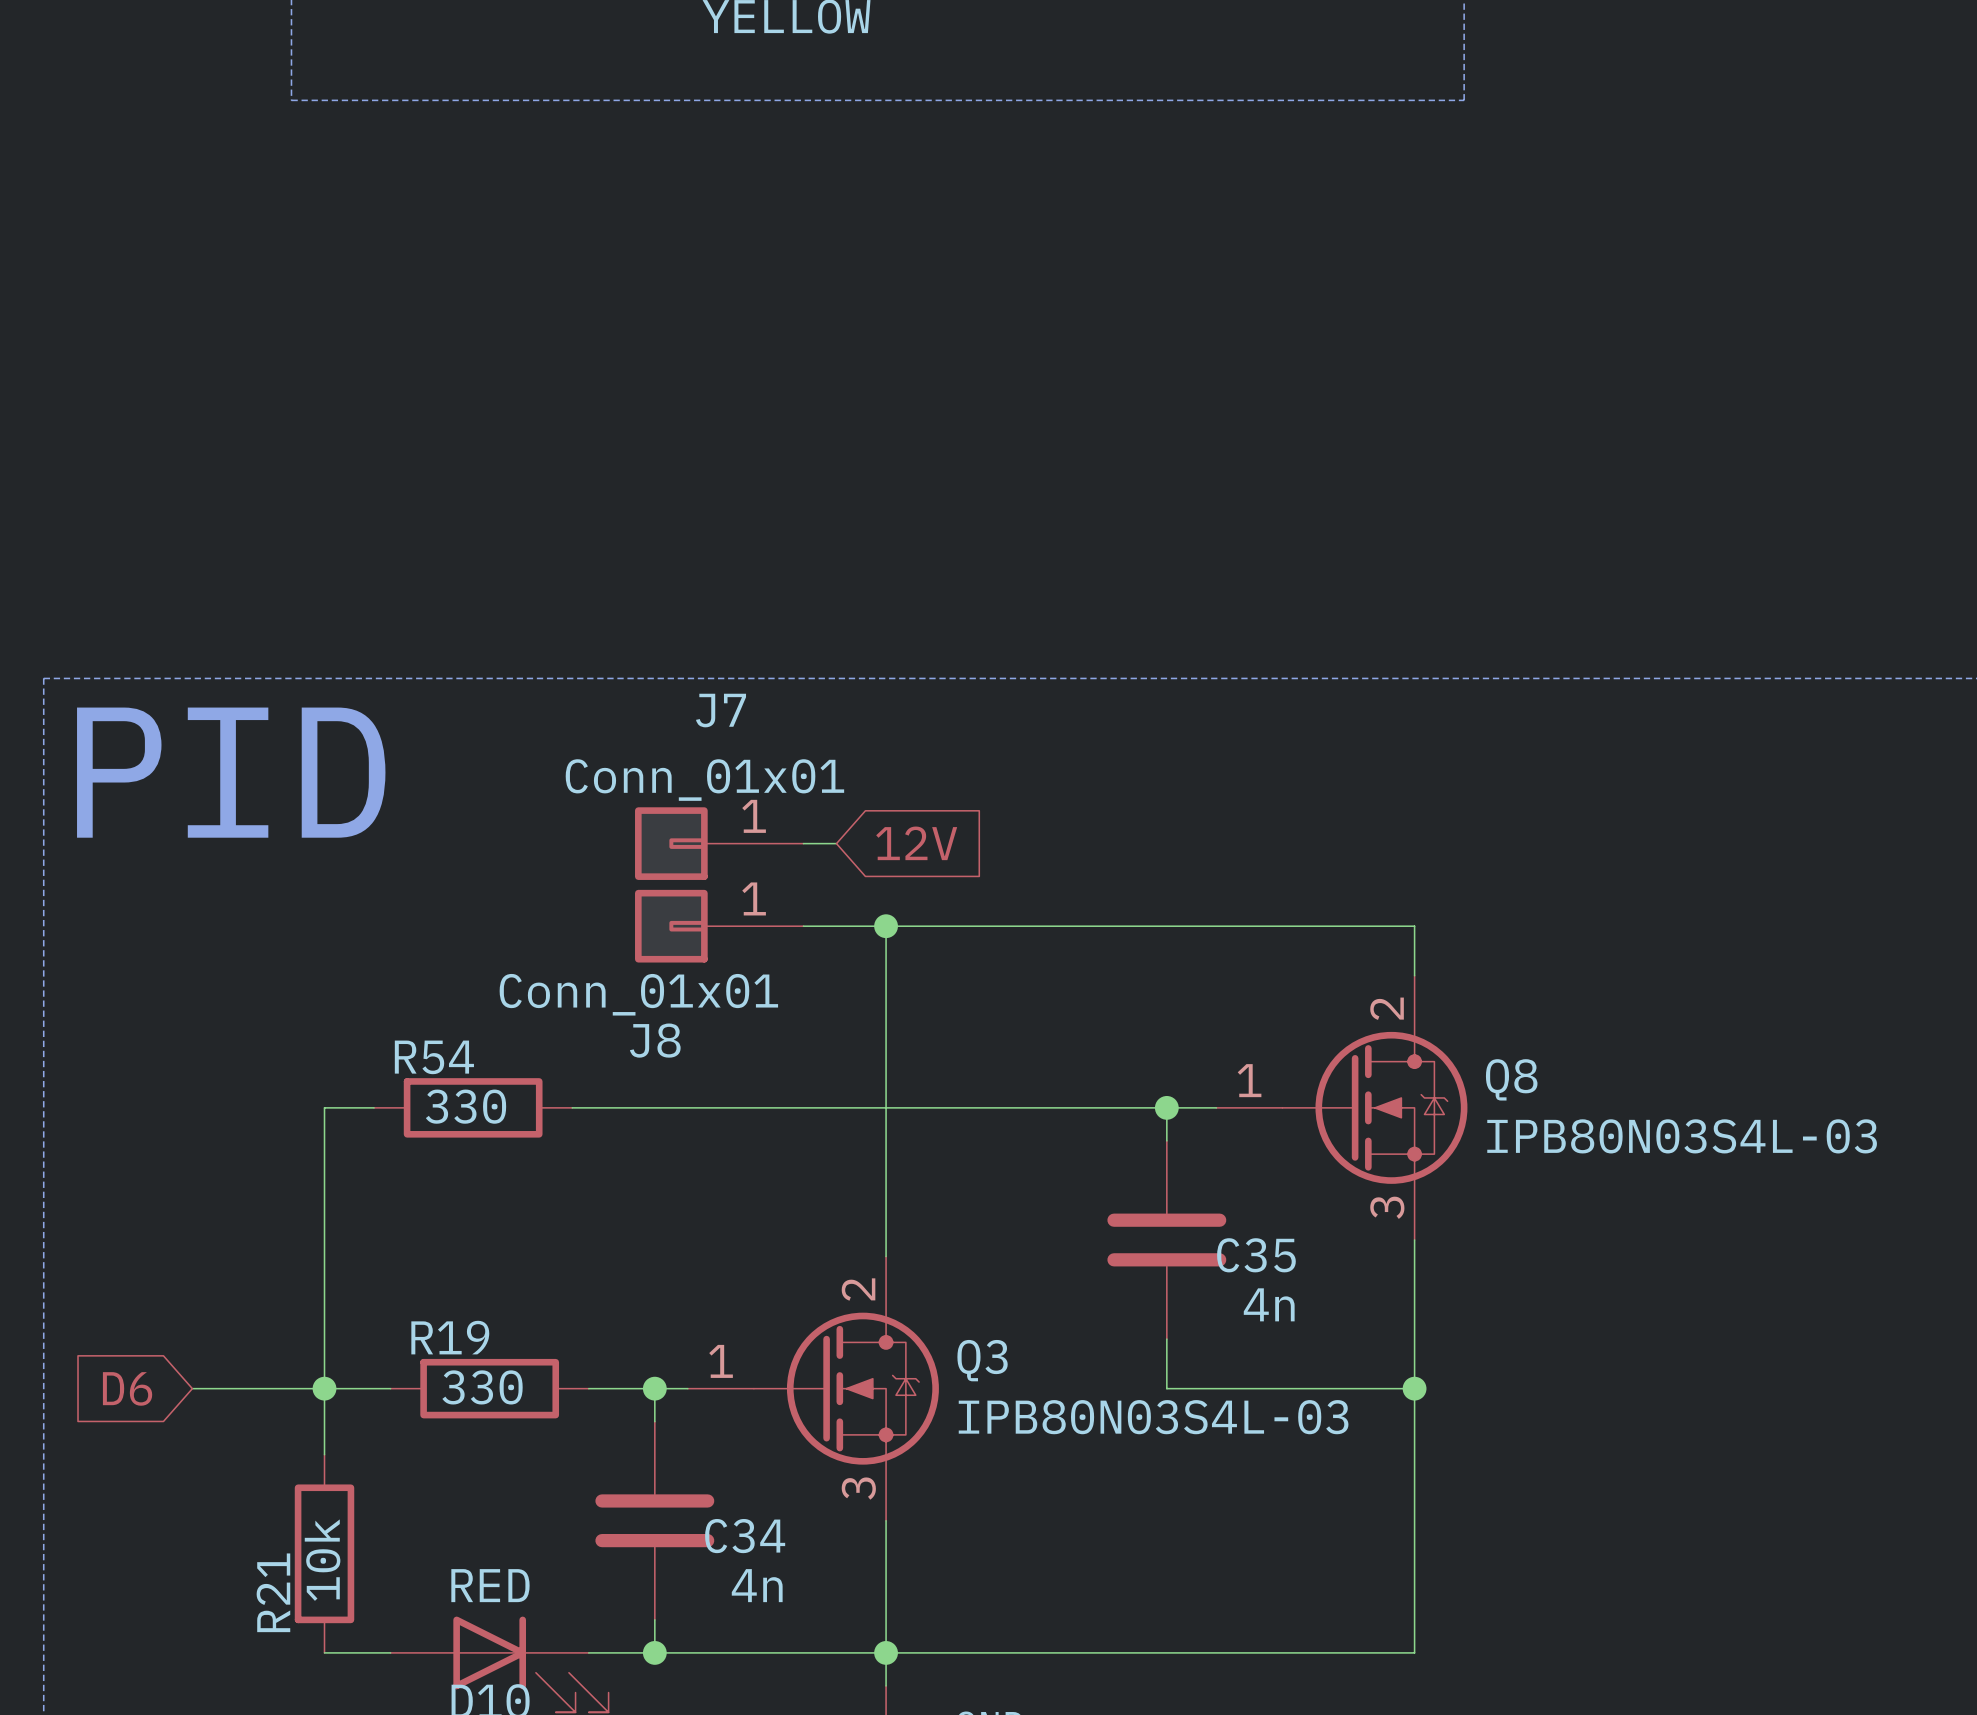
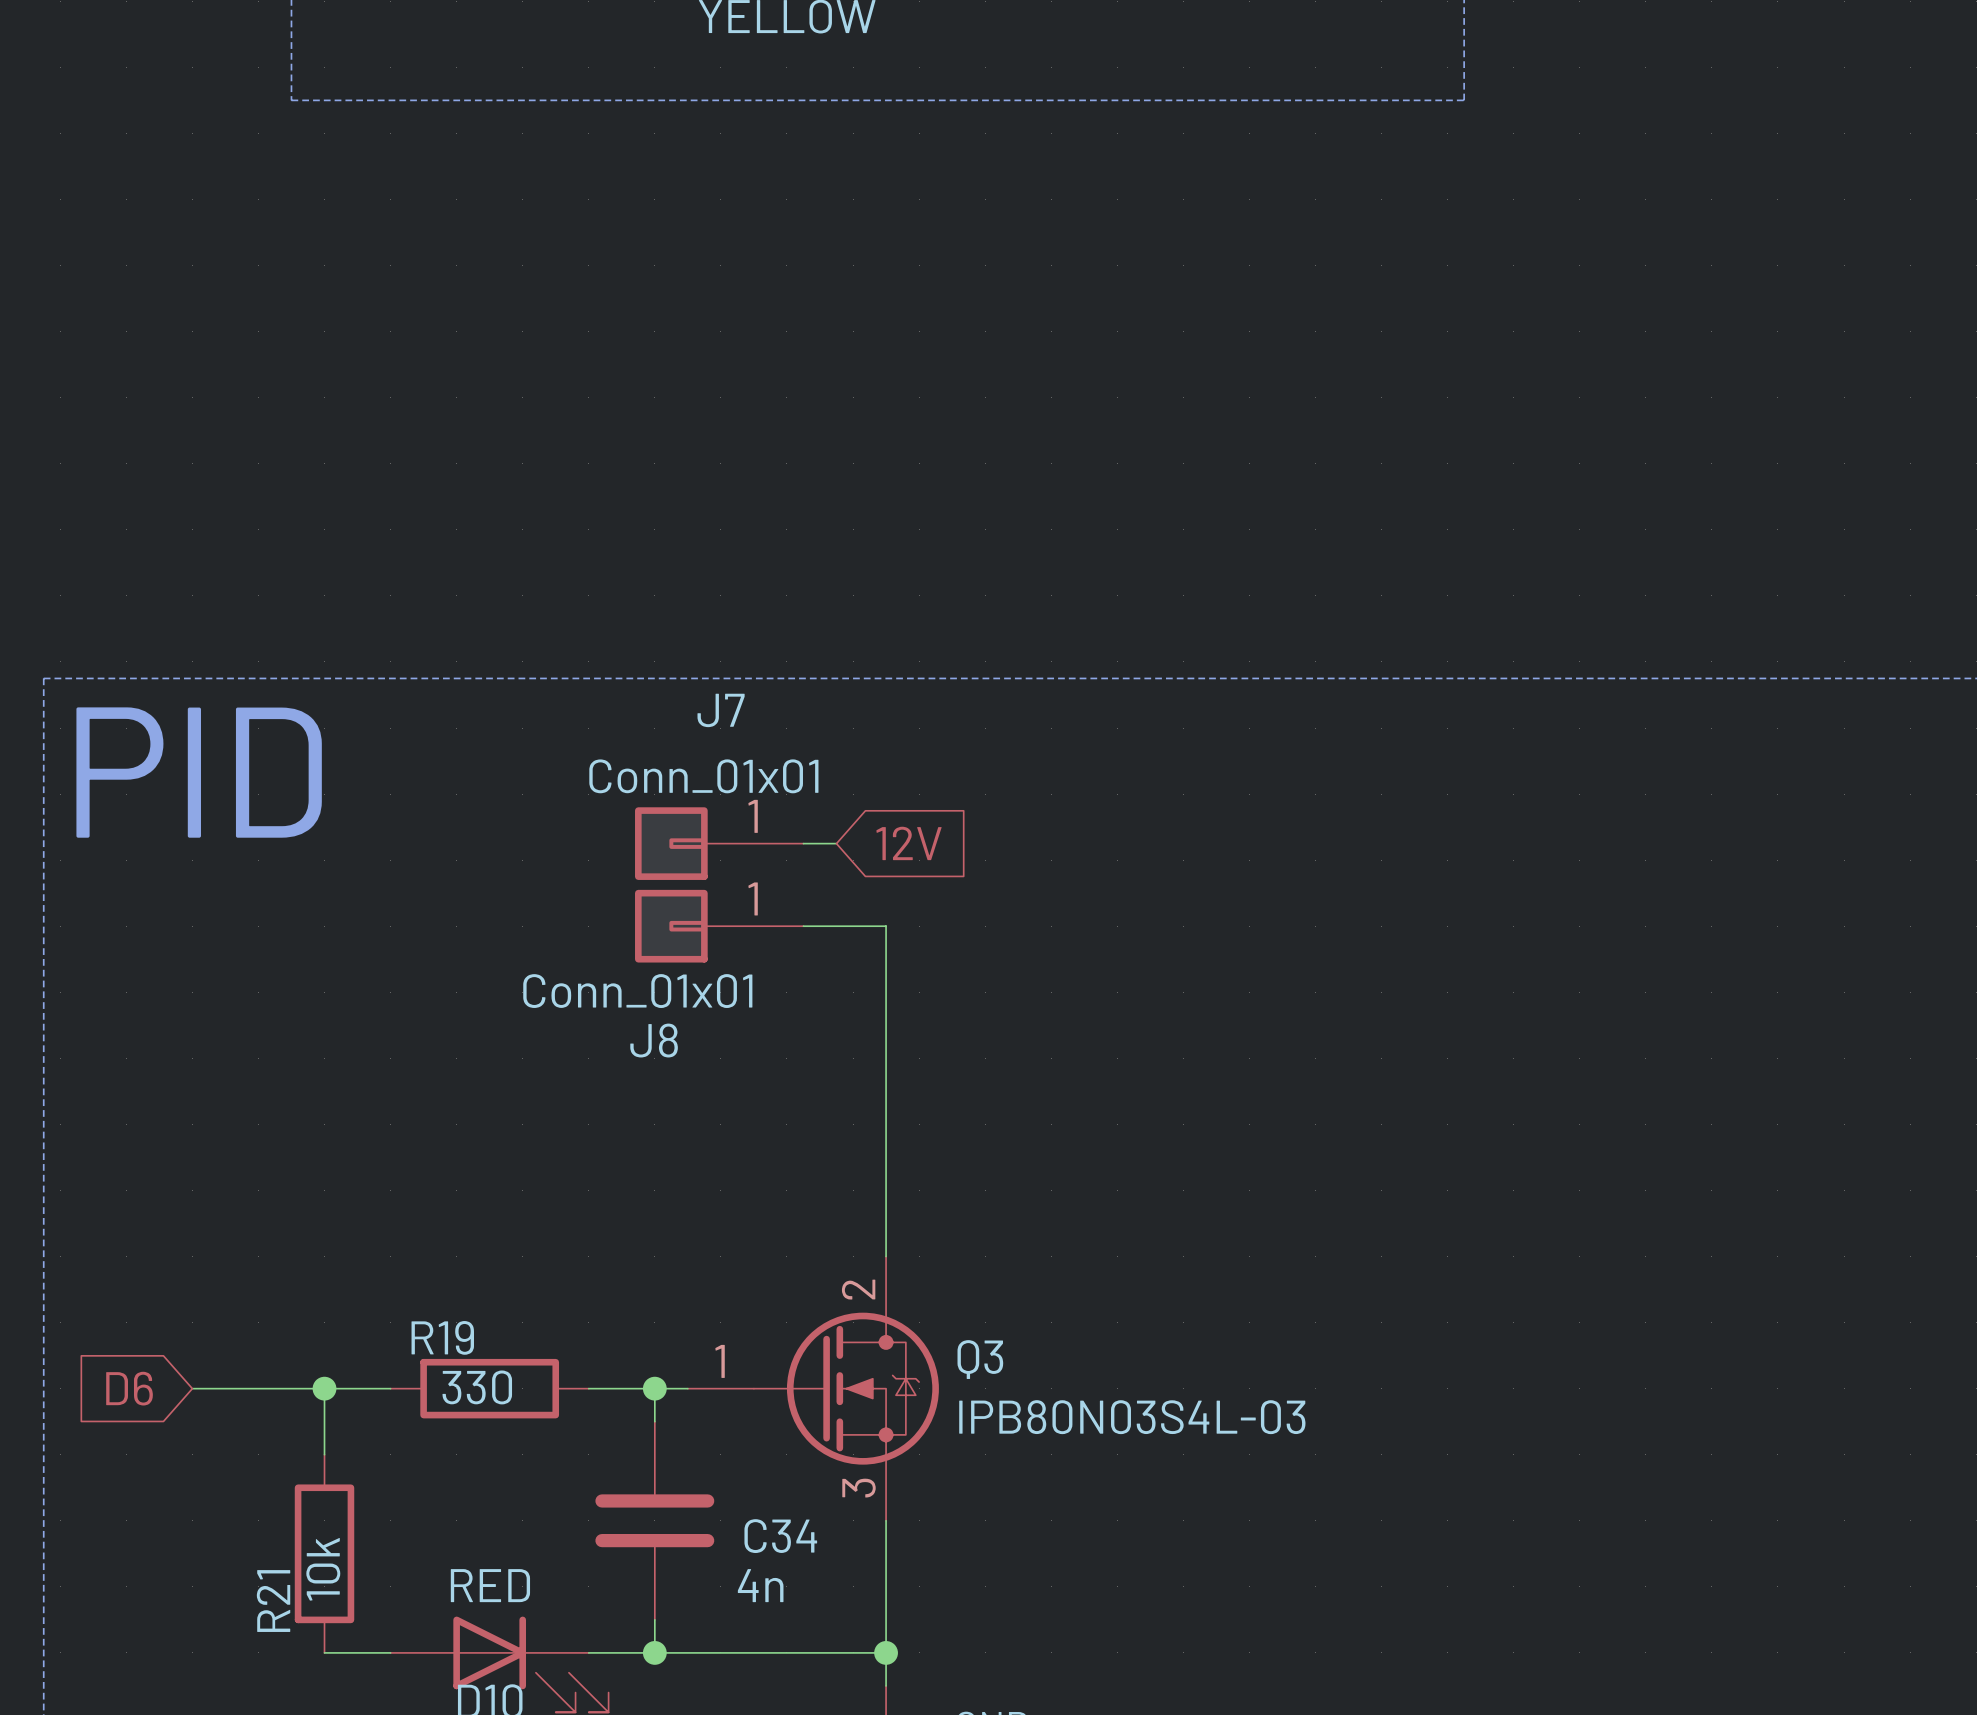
wire: (886, 926) (1414, 926) (1414, 975) -> none
junction: (886, 926) -> none
wire: (374, 1107) (324, 1107) (324, 1388) -> none
R54: 330 (473, 1107) -> none
wire: (572, 1107) (1216, 1107) -> none
wire: (1166, 1107) (1166, 1140) -> none
junction: (1166, 1107) -> none
Q8: IPB80N03S4L-03 (1341, 1107) -> none
C35: 4n (1166, 1240) -> none
wire: (1414, 1240) (1414, 1652) (886, 1652) -> none
wire: (1166, 1339) (1166, 1388) (1414, 1388) -> none
junction: (1414, 1388) -> none
C34 name position: C34 (745, 1536) -> C34 (780, 1536)

